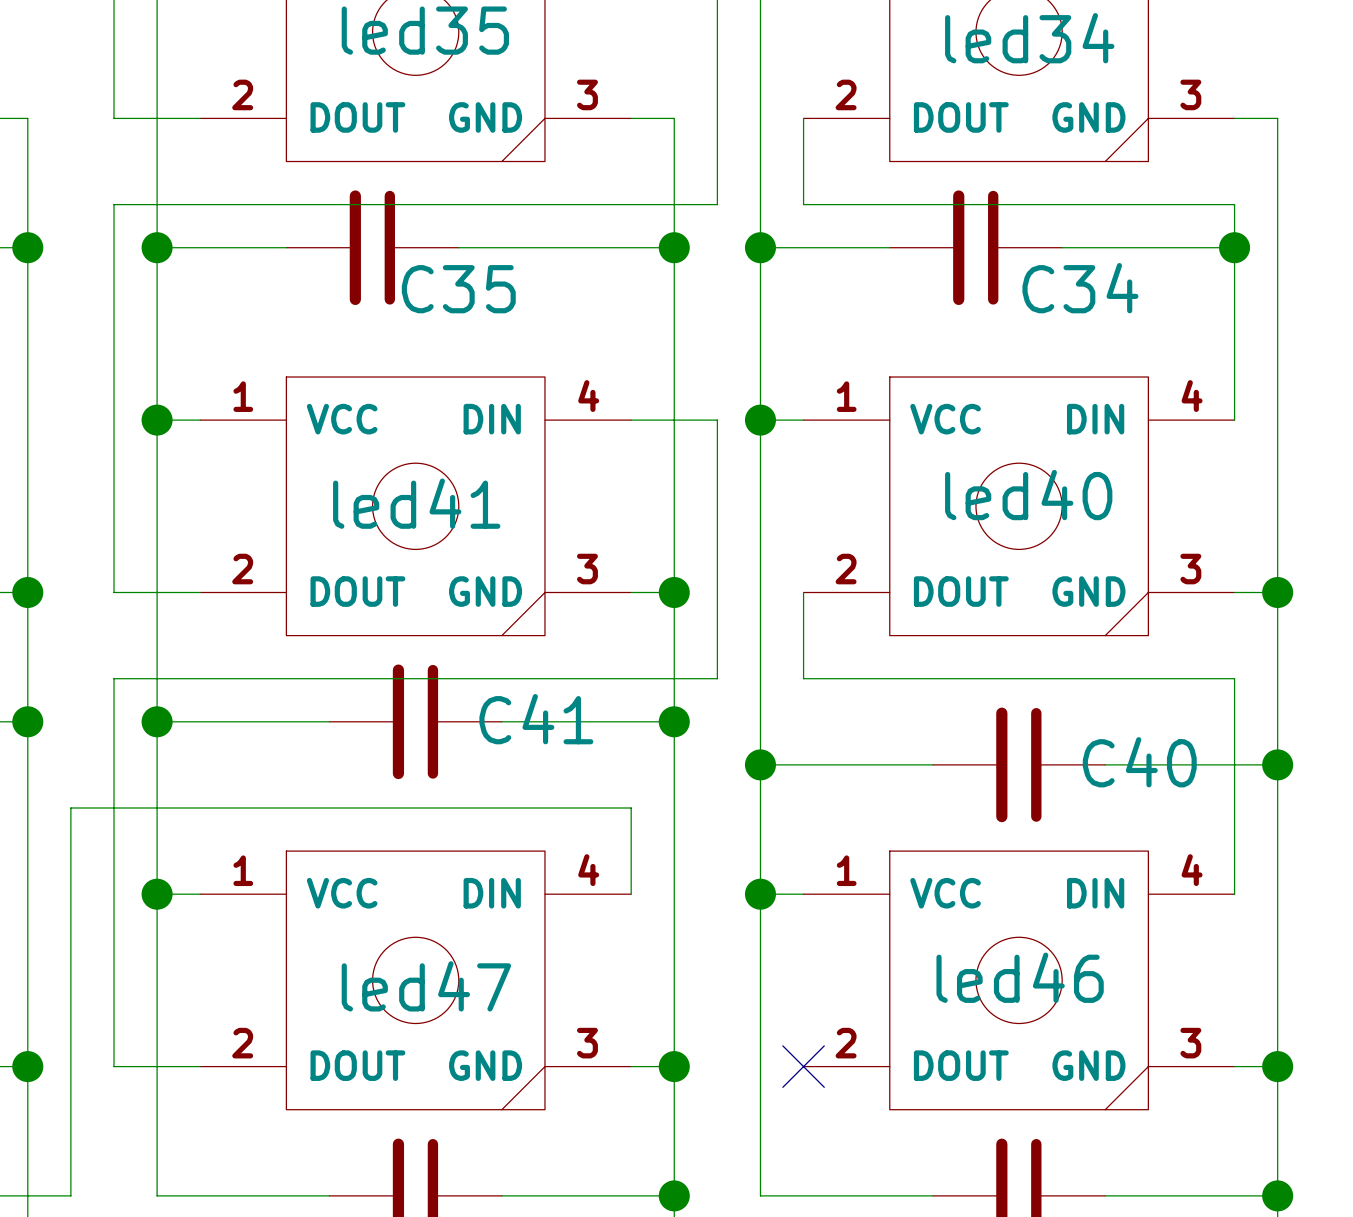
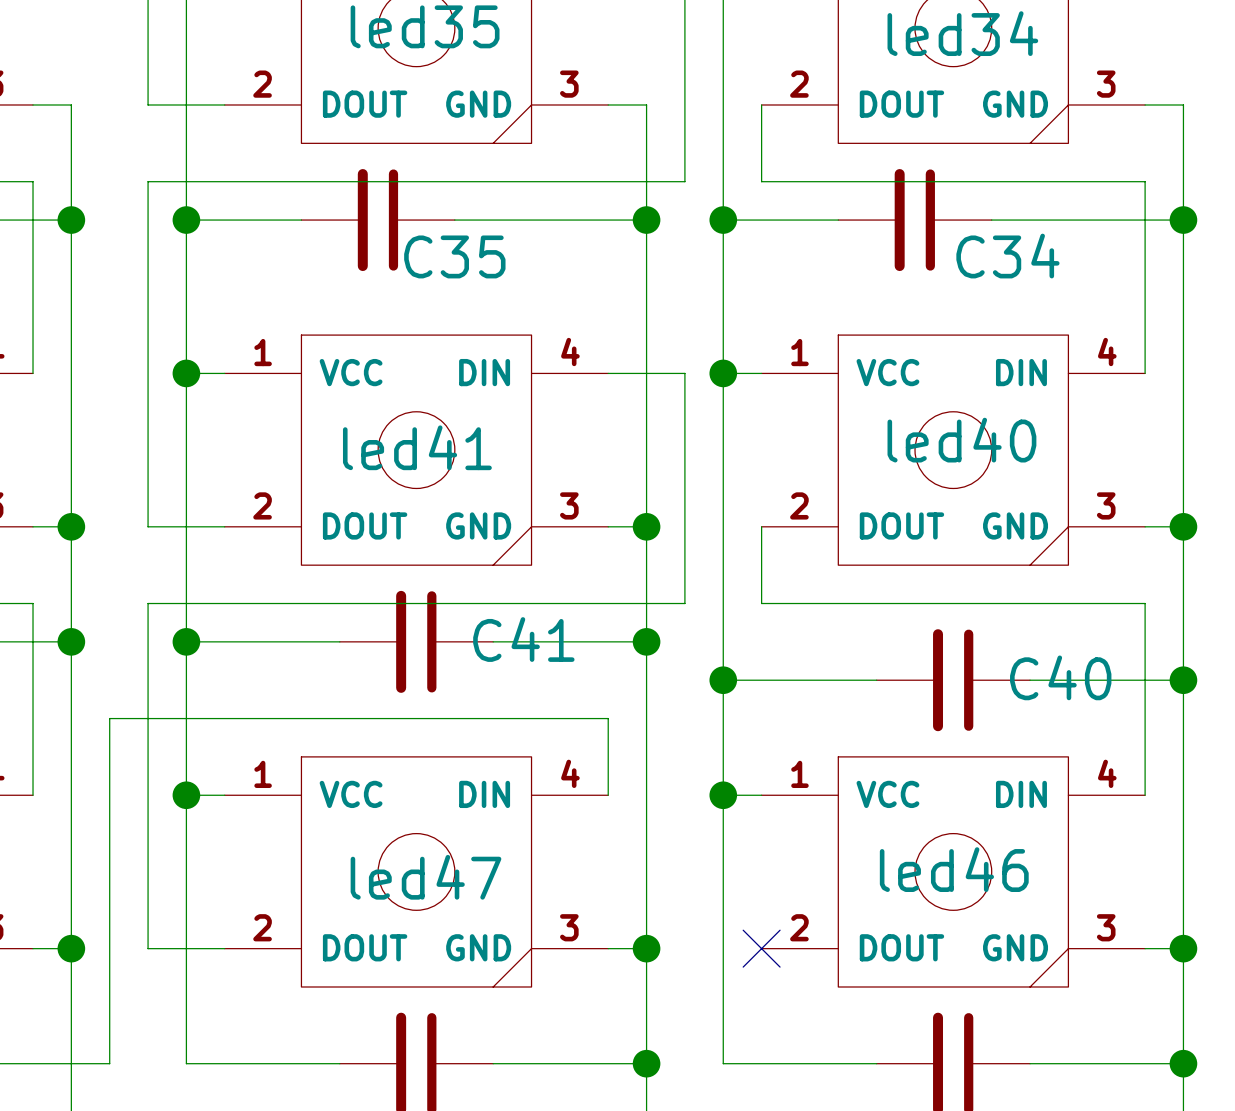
wire: none -> (1145, 220) (1183, 220)
junction position: (1234, 247) -> (1183, 220)

